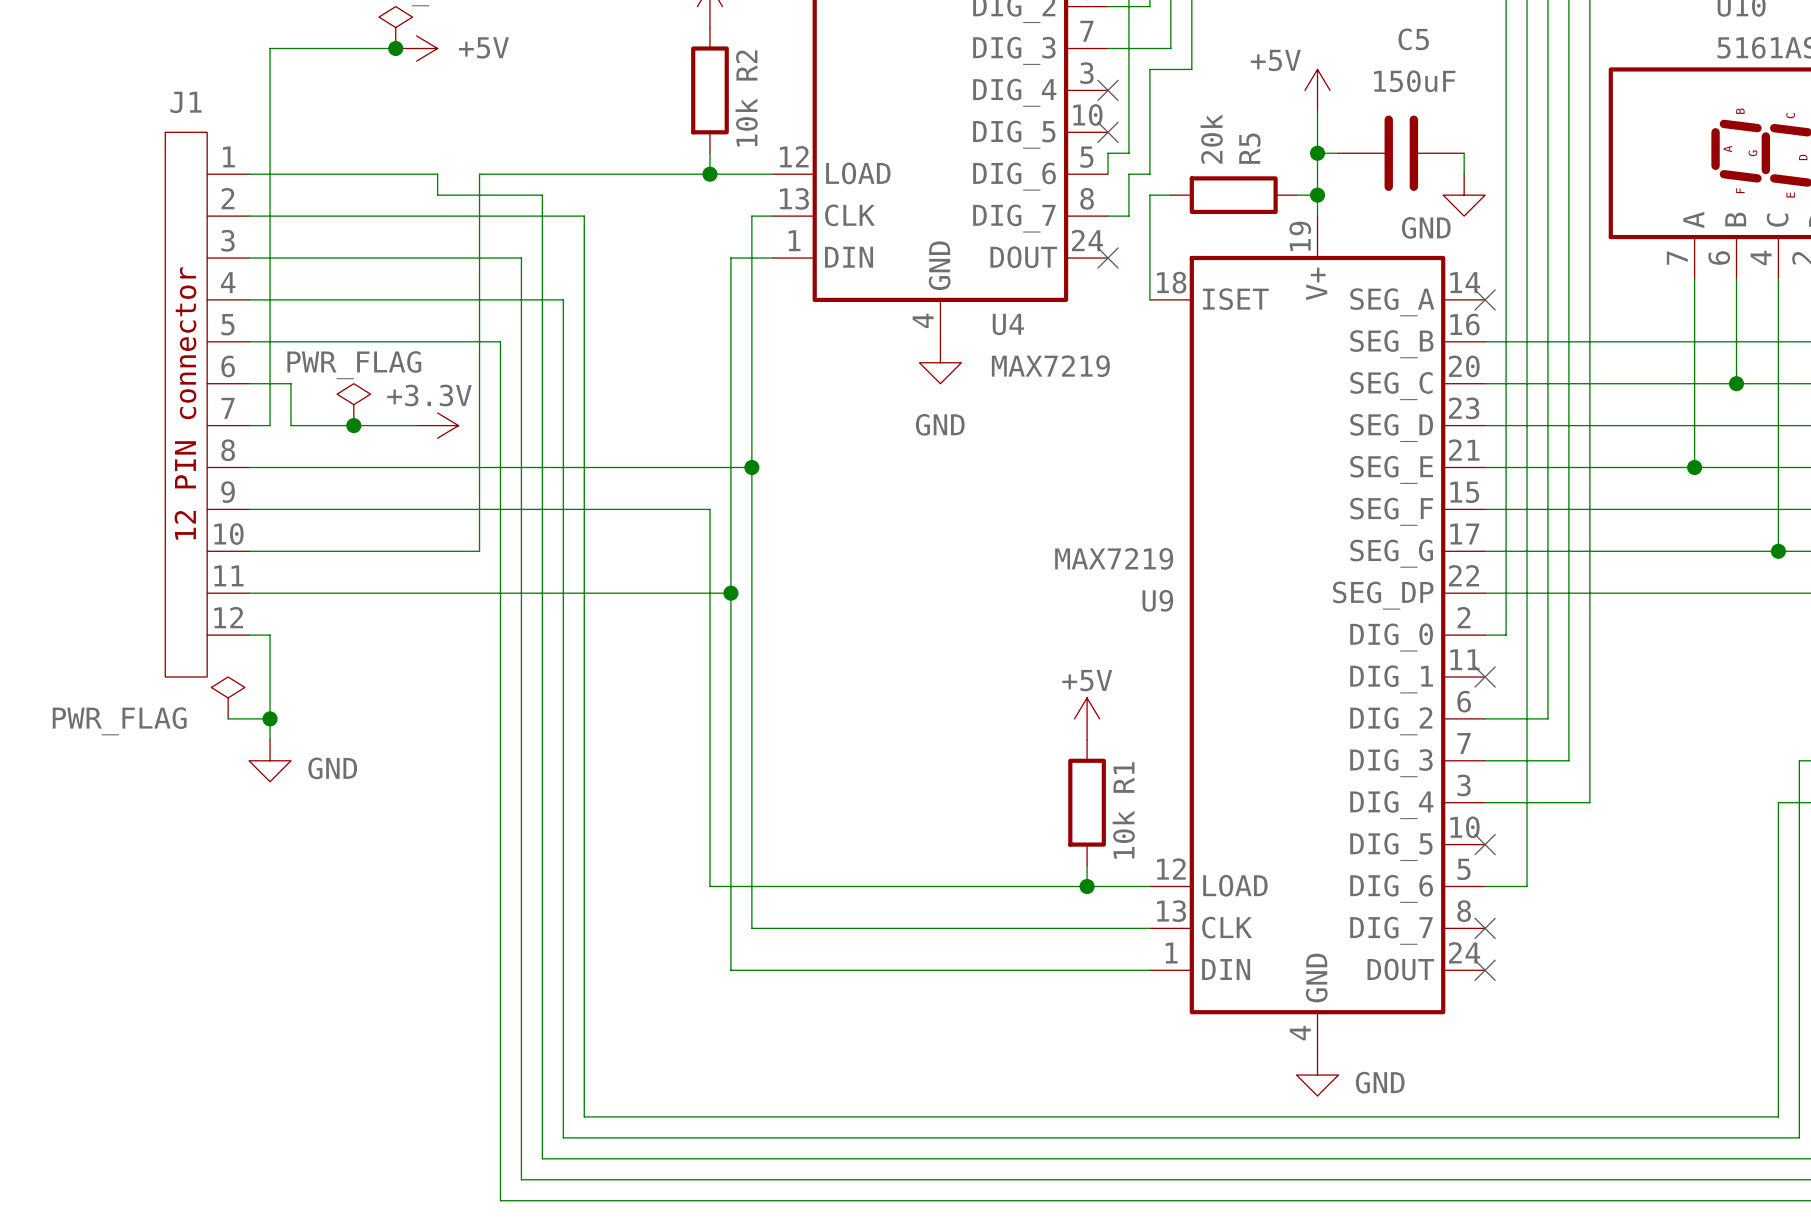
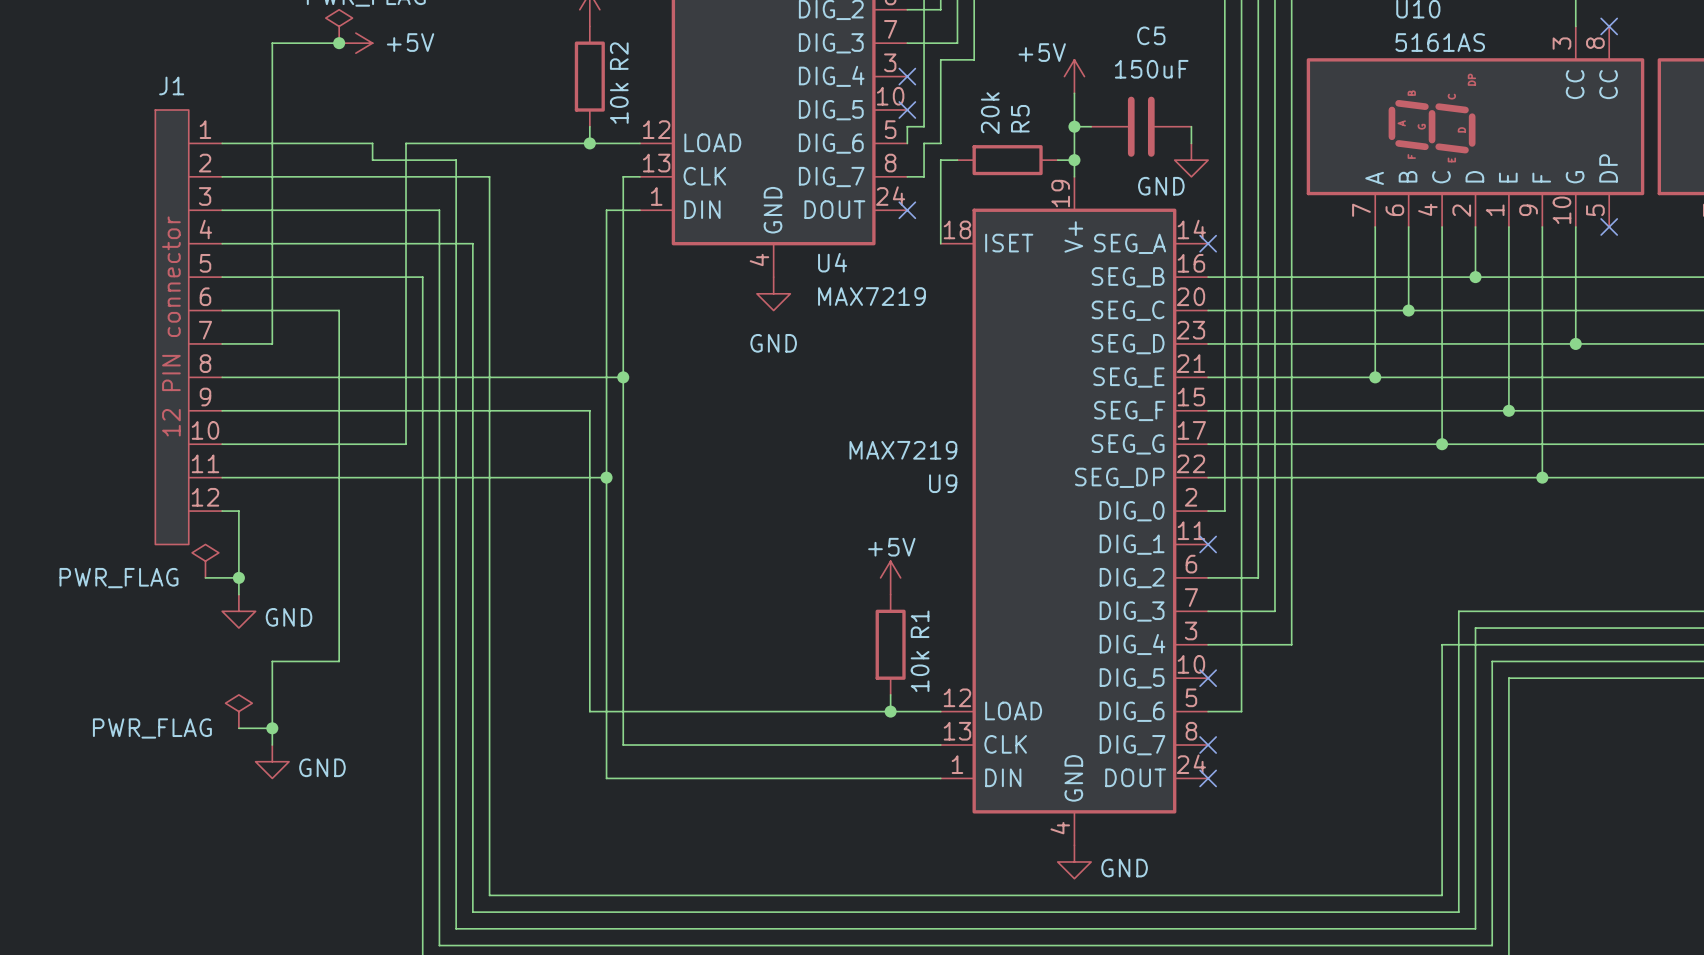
wire: (311, 48) (270, 48) (270, 425) -> (272, 43) (272, 343)
wire: (290, 383) (290, 425) -> (238, 343) (255, 343)
wire: none -> (255, 310) (339, 310) (339, 661) (272, 661) (272, 745)
power symbol: PWR_FLAG (353, 404) -> none
wire: (311, 425) (416, 425) -> none
junction: (353, 425) -> none
power symbol: +3.3V (437, 425) -> none
power symbol: none -> PWR_FLAG (238, 711)
wire: none -> (238, 728) (272, 728)
junction: none -> (272, 728)
power symbol: none -> GND (272, 761)

